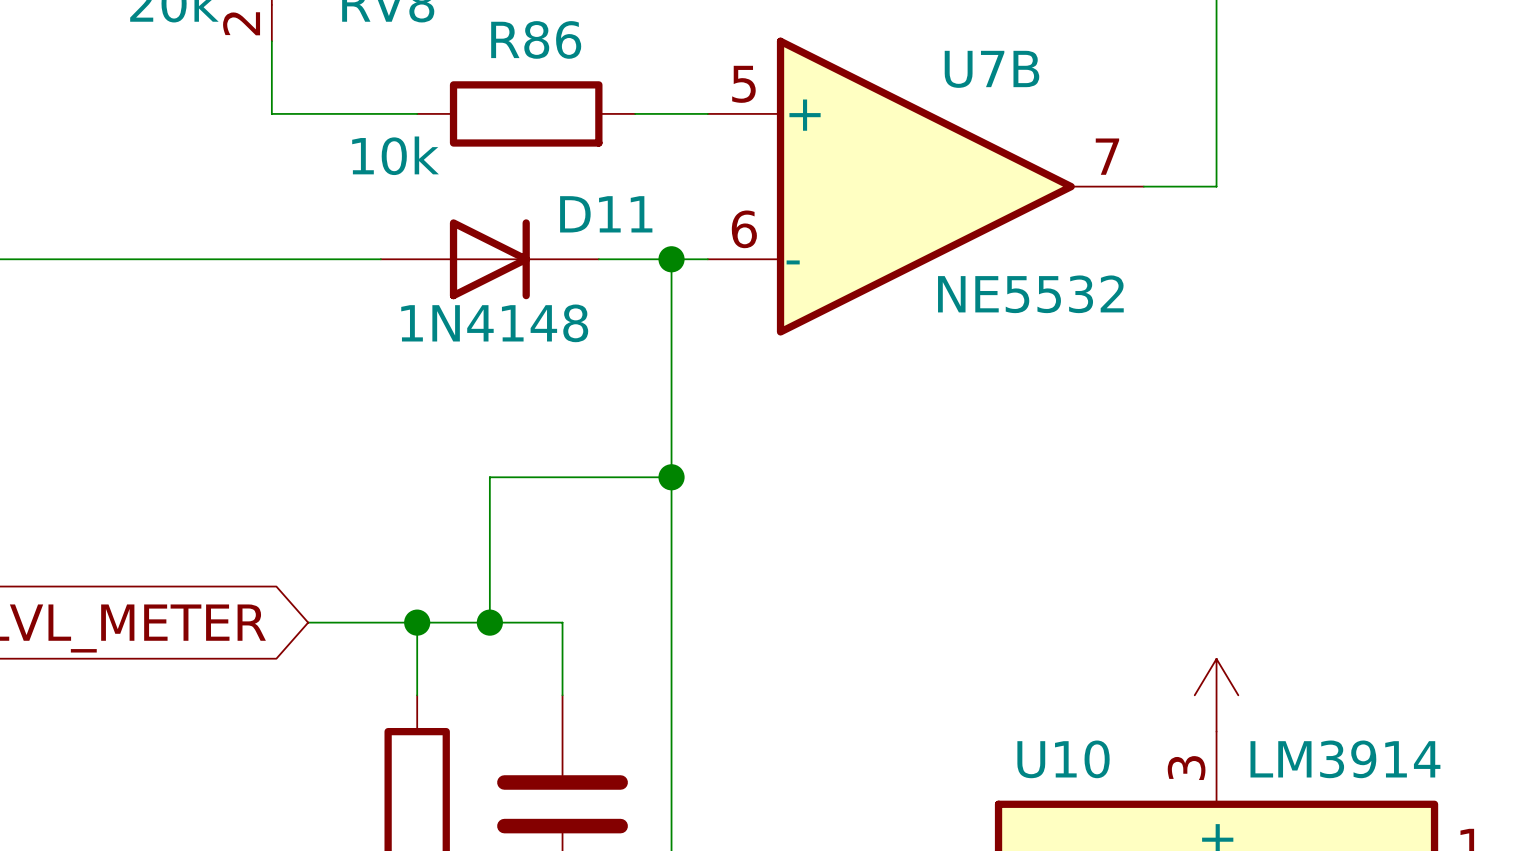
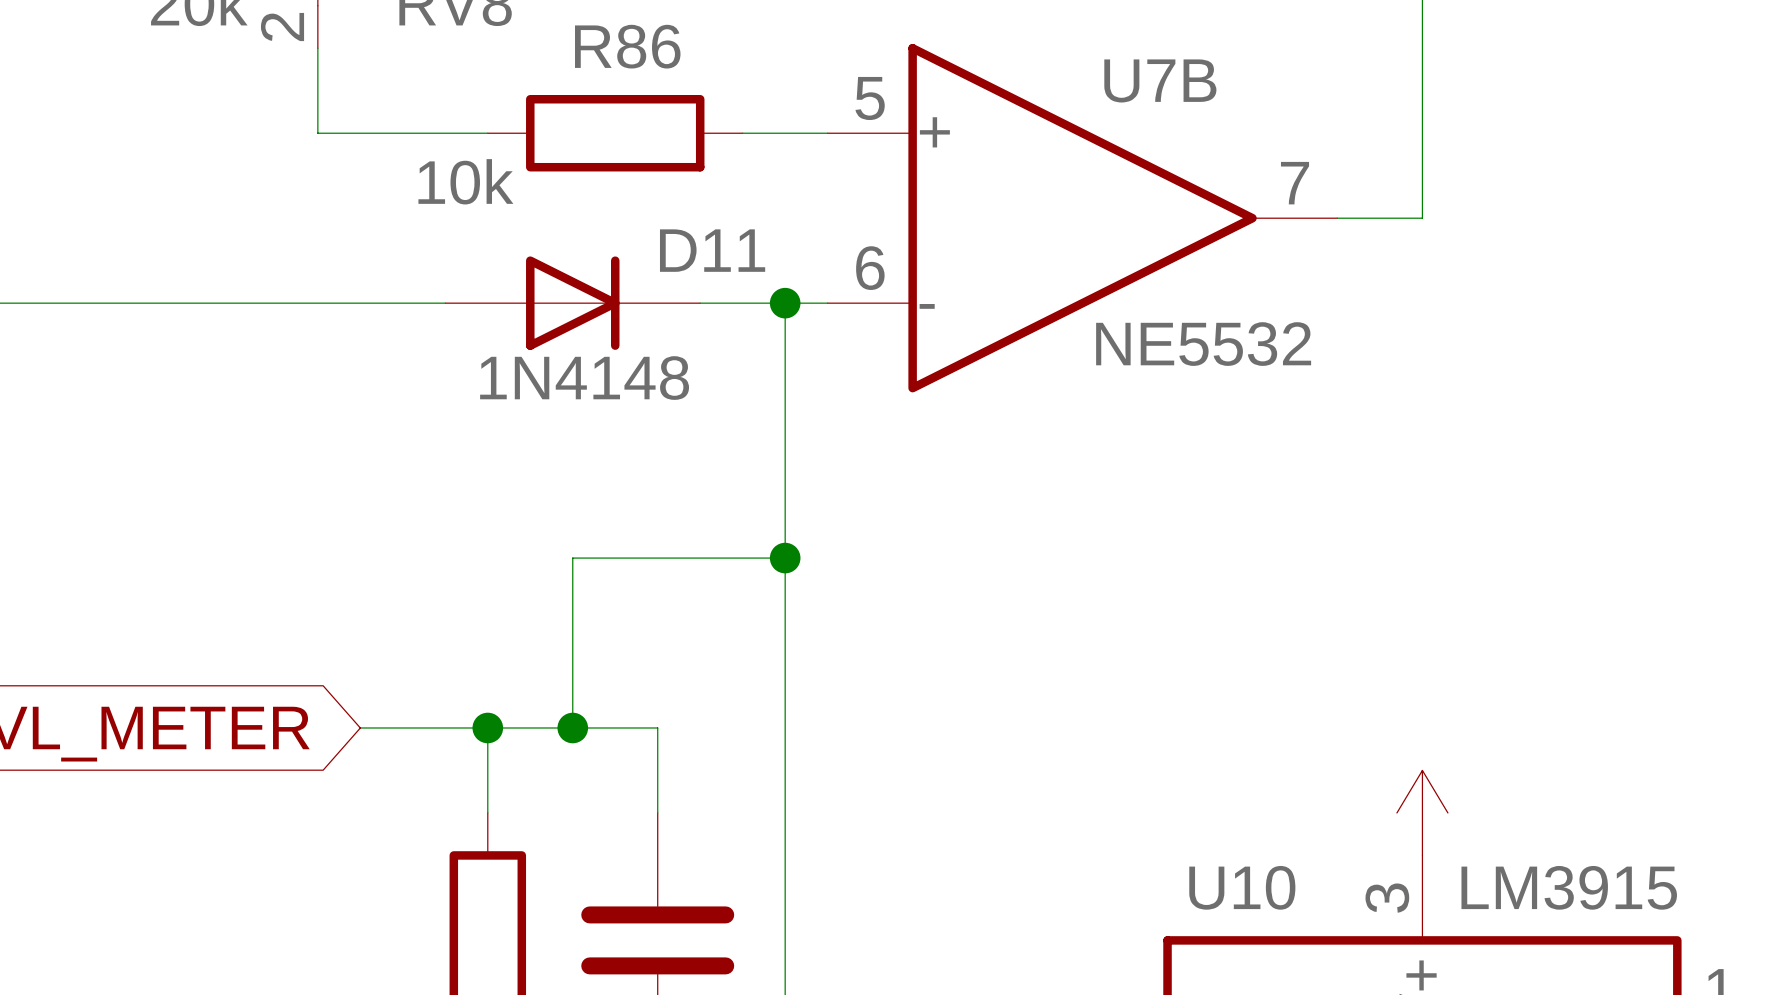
U10 value: LM3914 (1345, 759) -> LM3915 (1569, 887)

